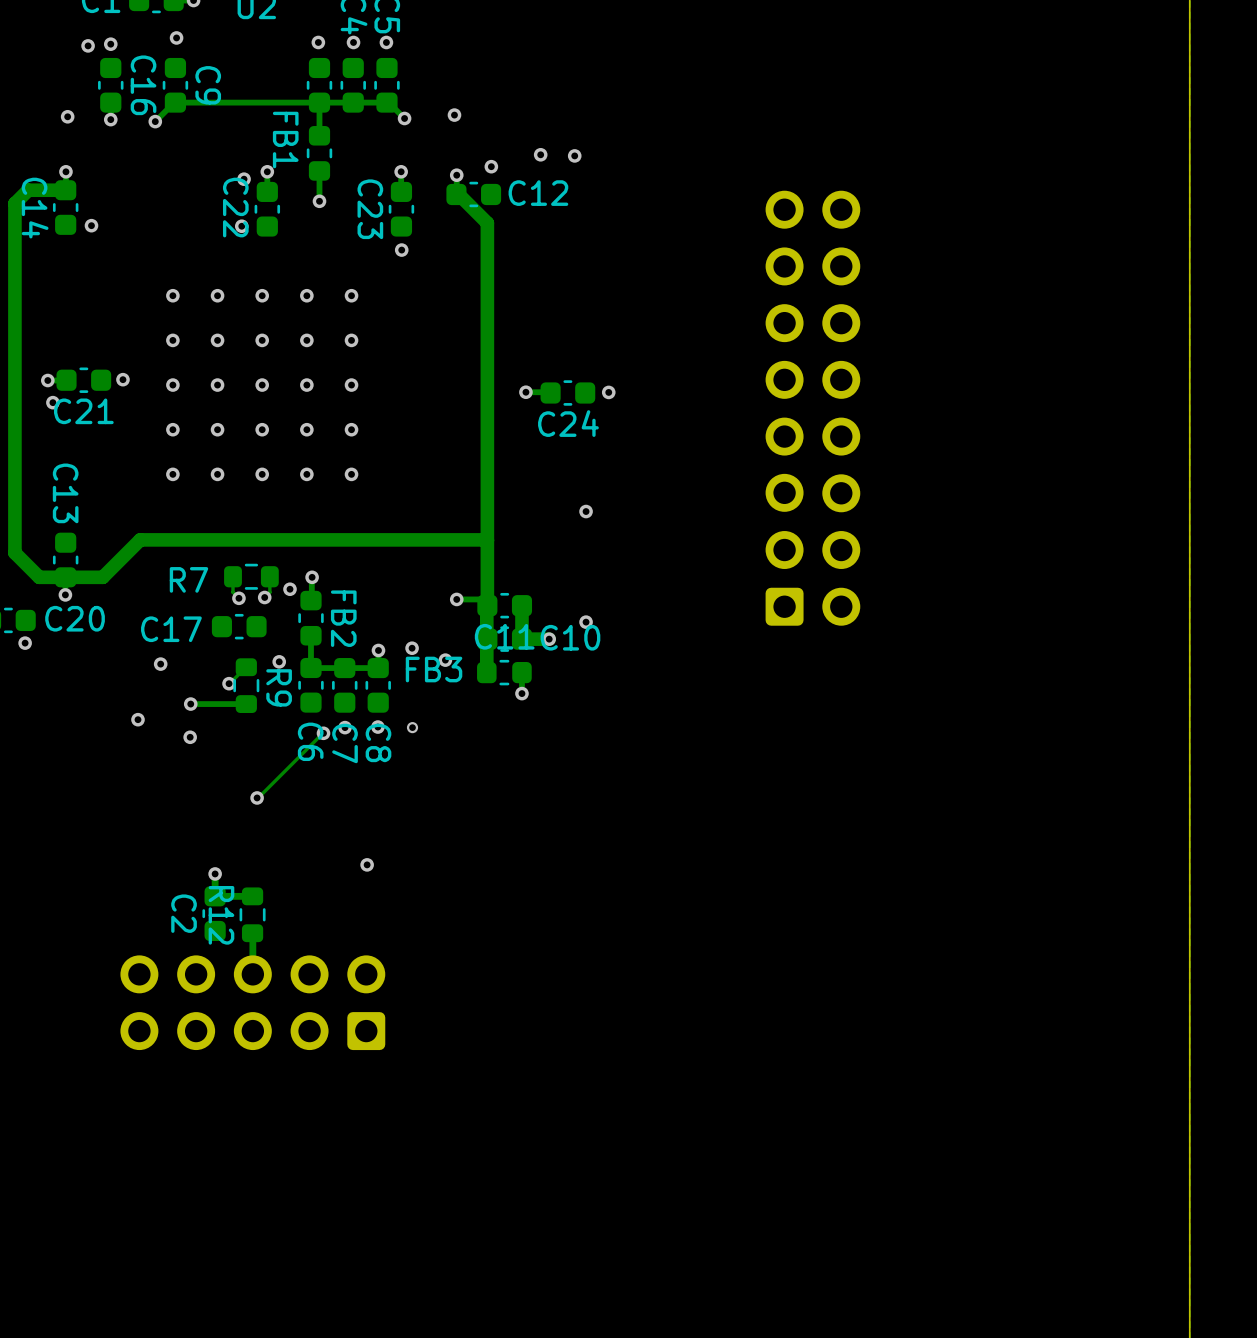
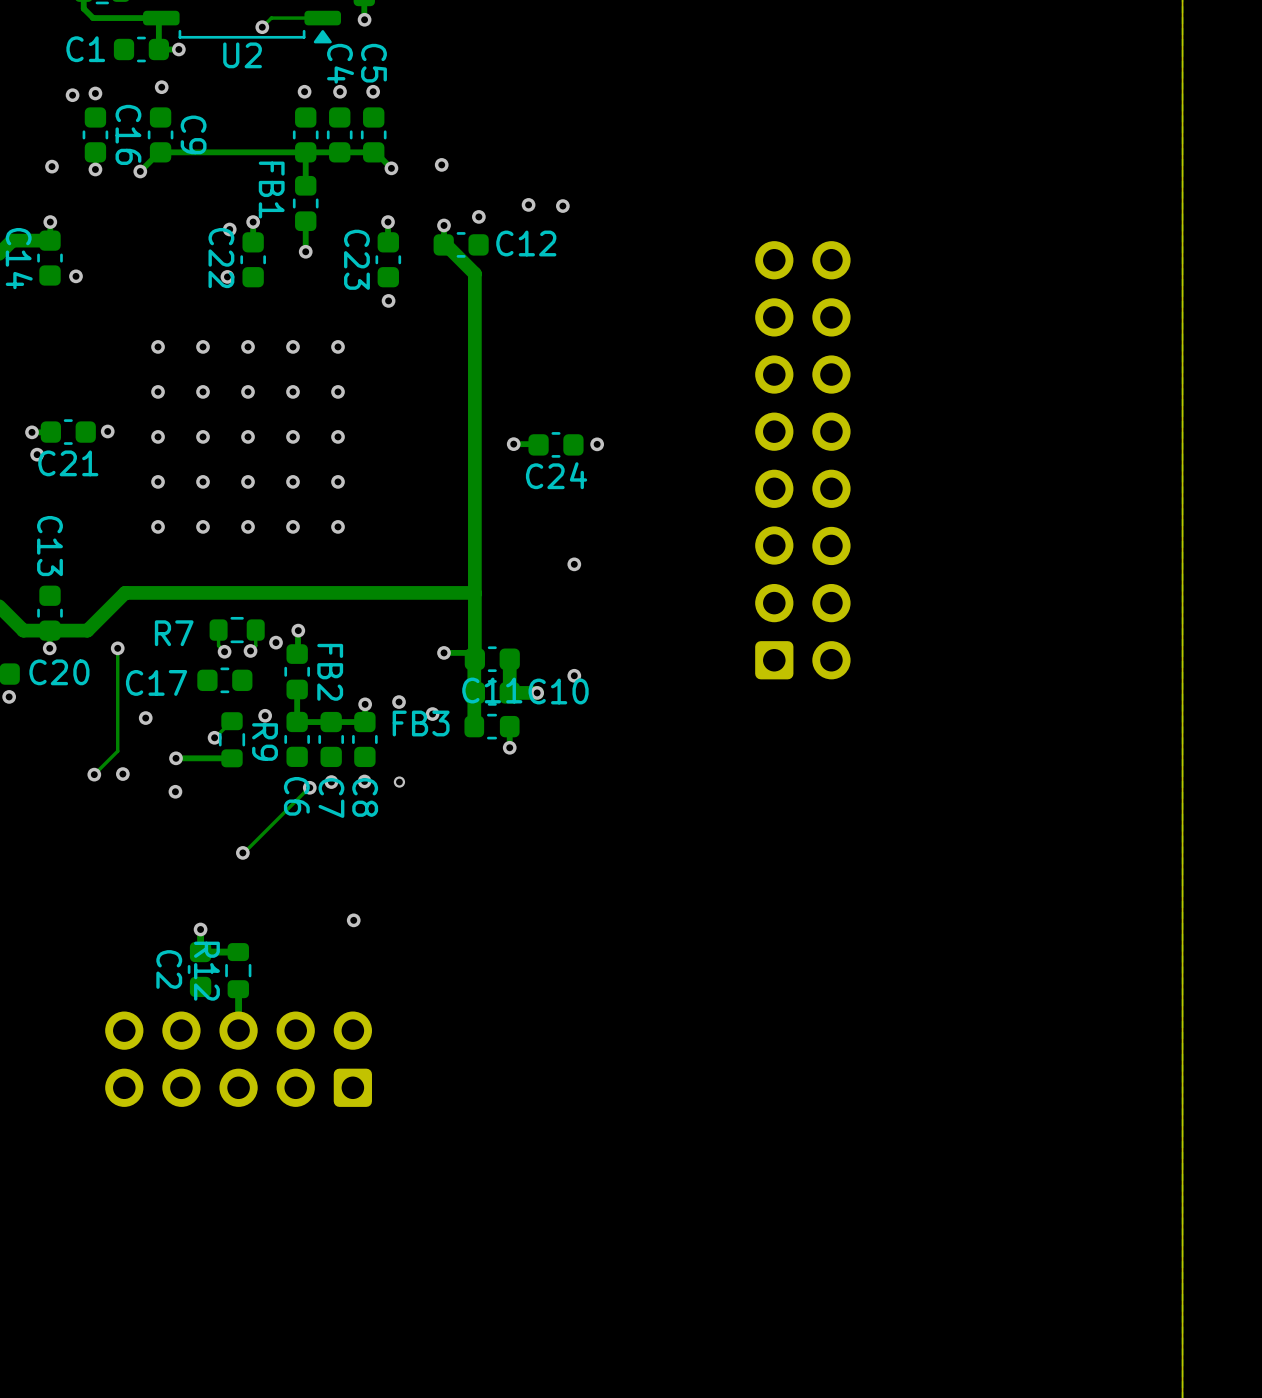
track: none -> (117, 648) (117, 751) (94, 774)
via: none -> (117, 648)
via: none -> (94, 774)

